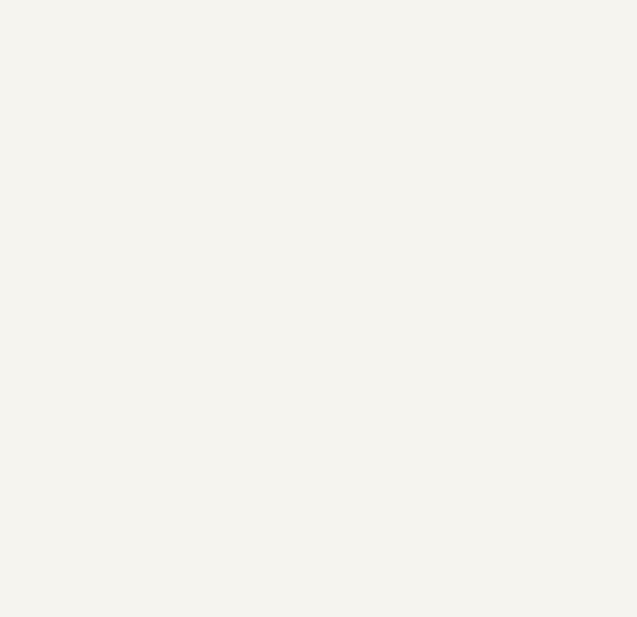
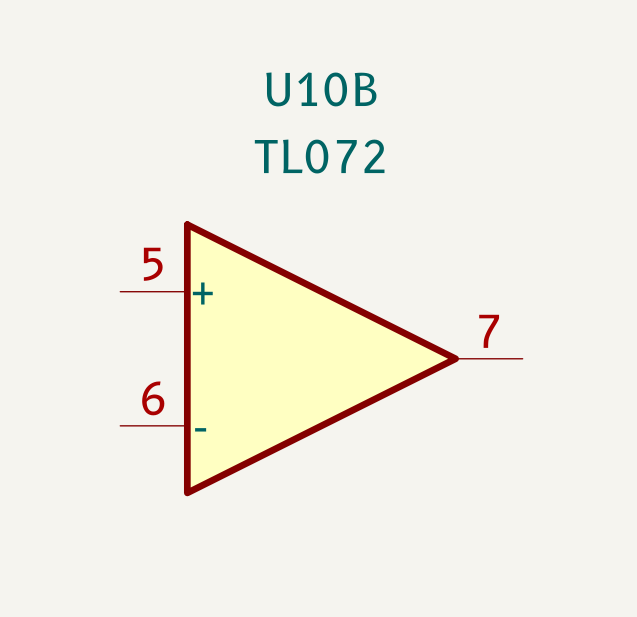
U10B: none -> TL072 (321, 358)

